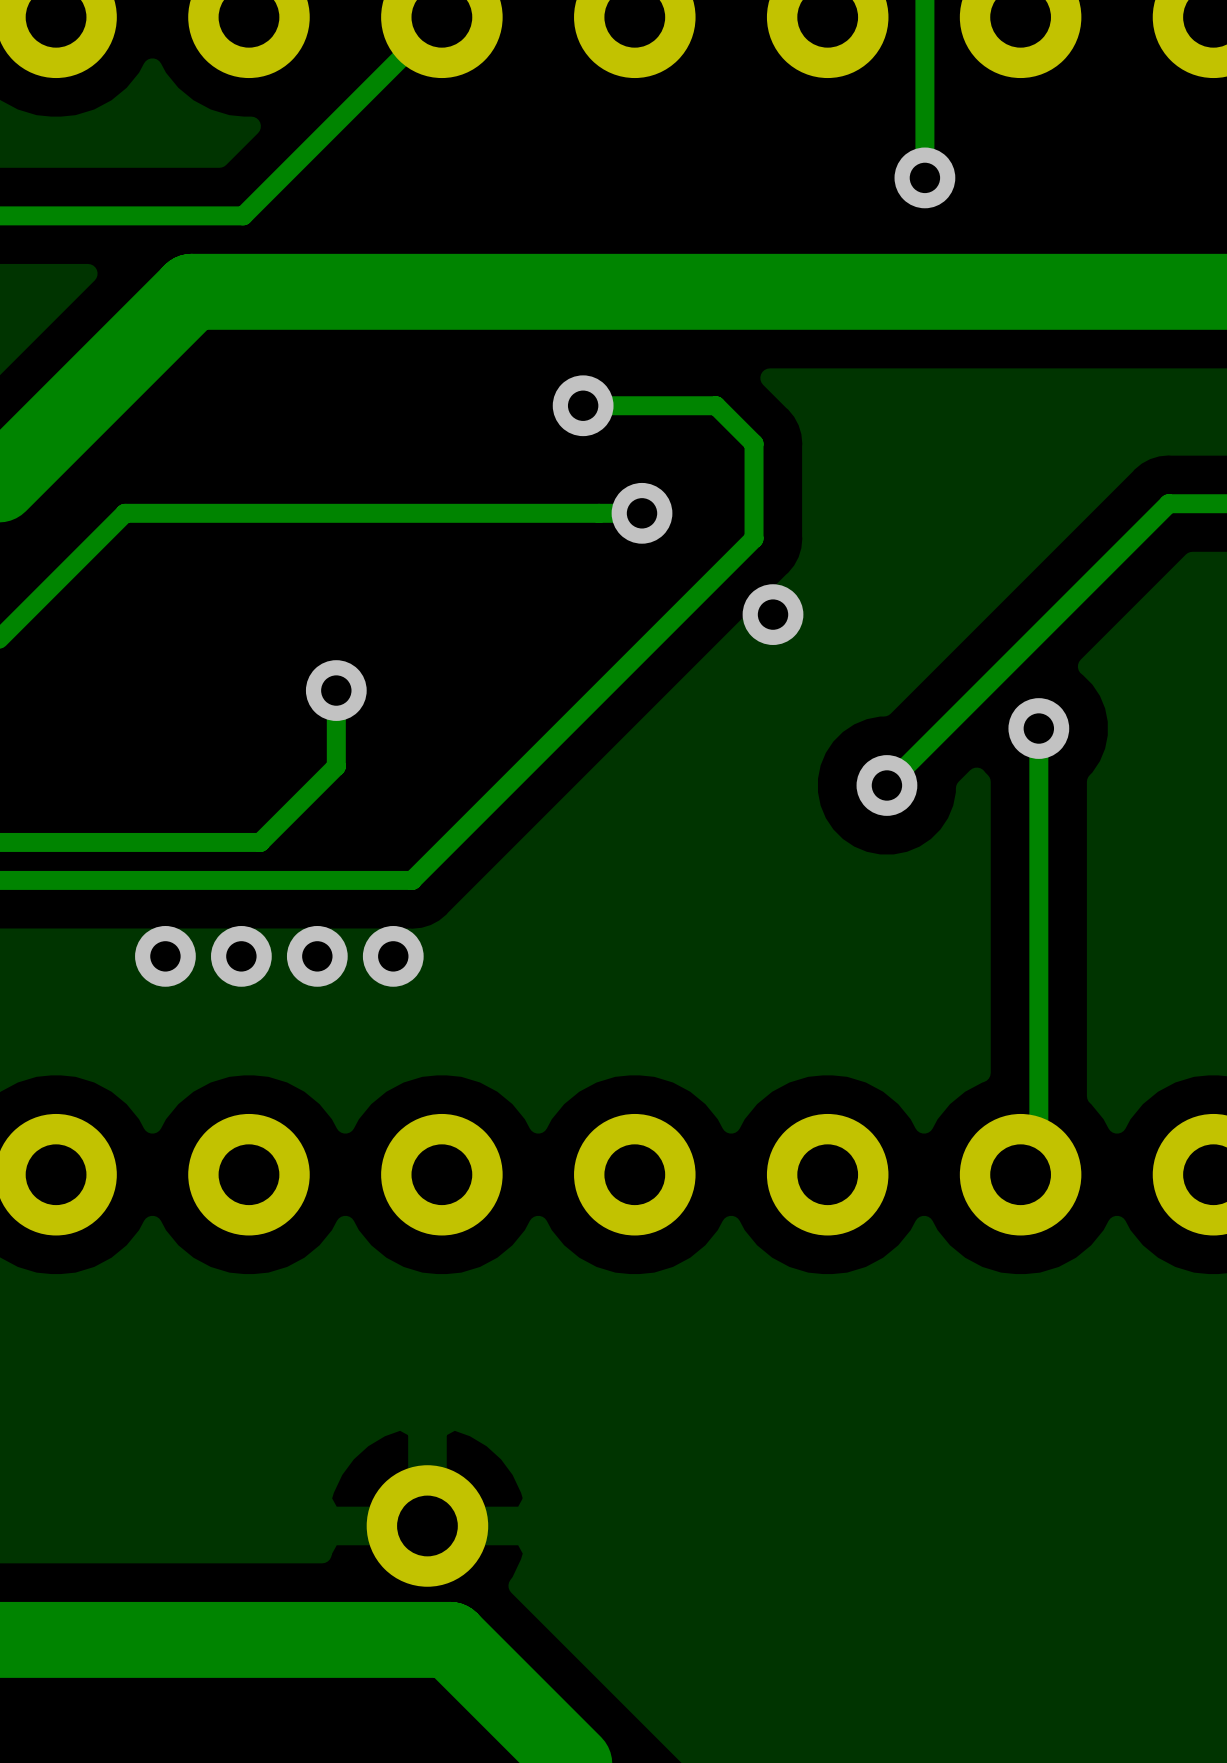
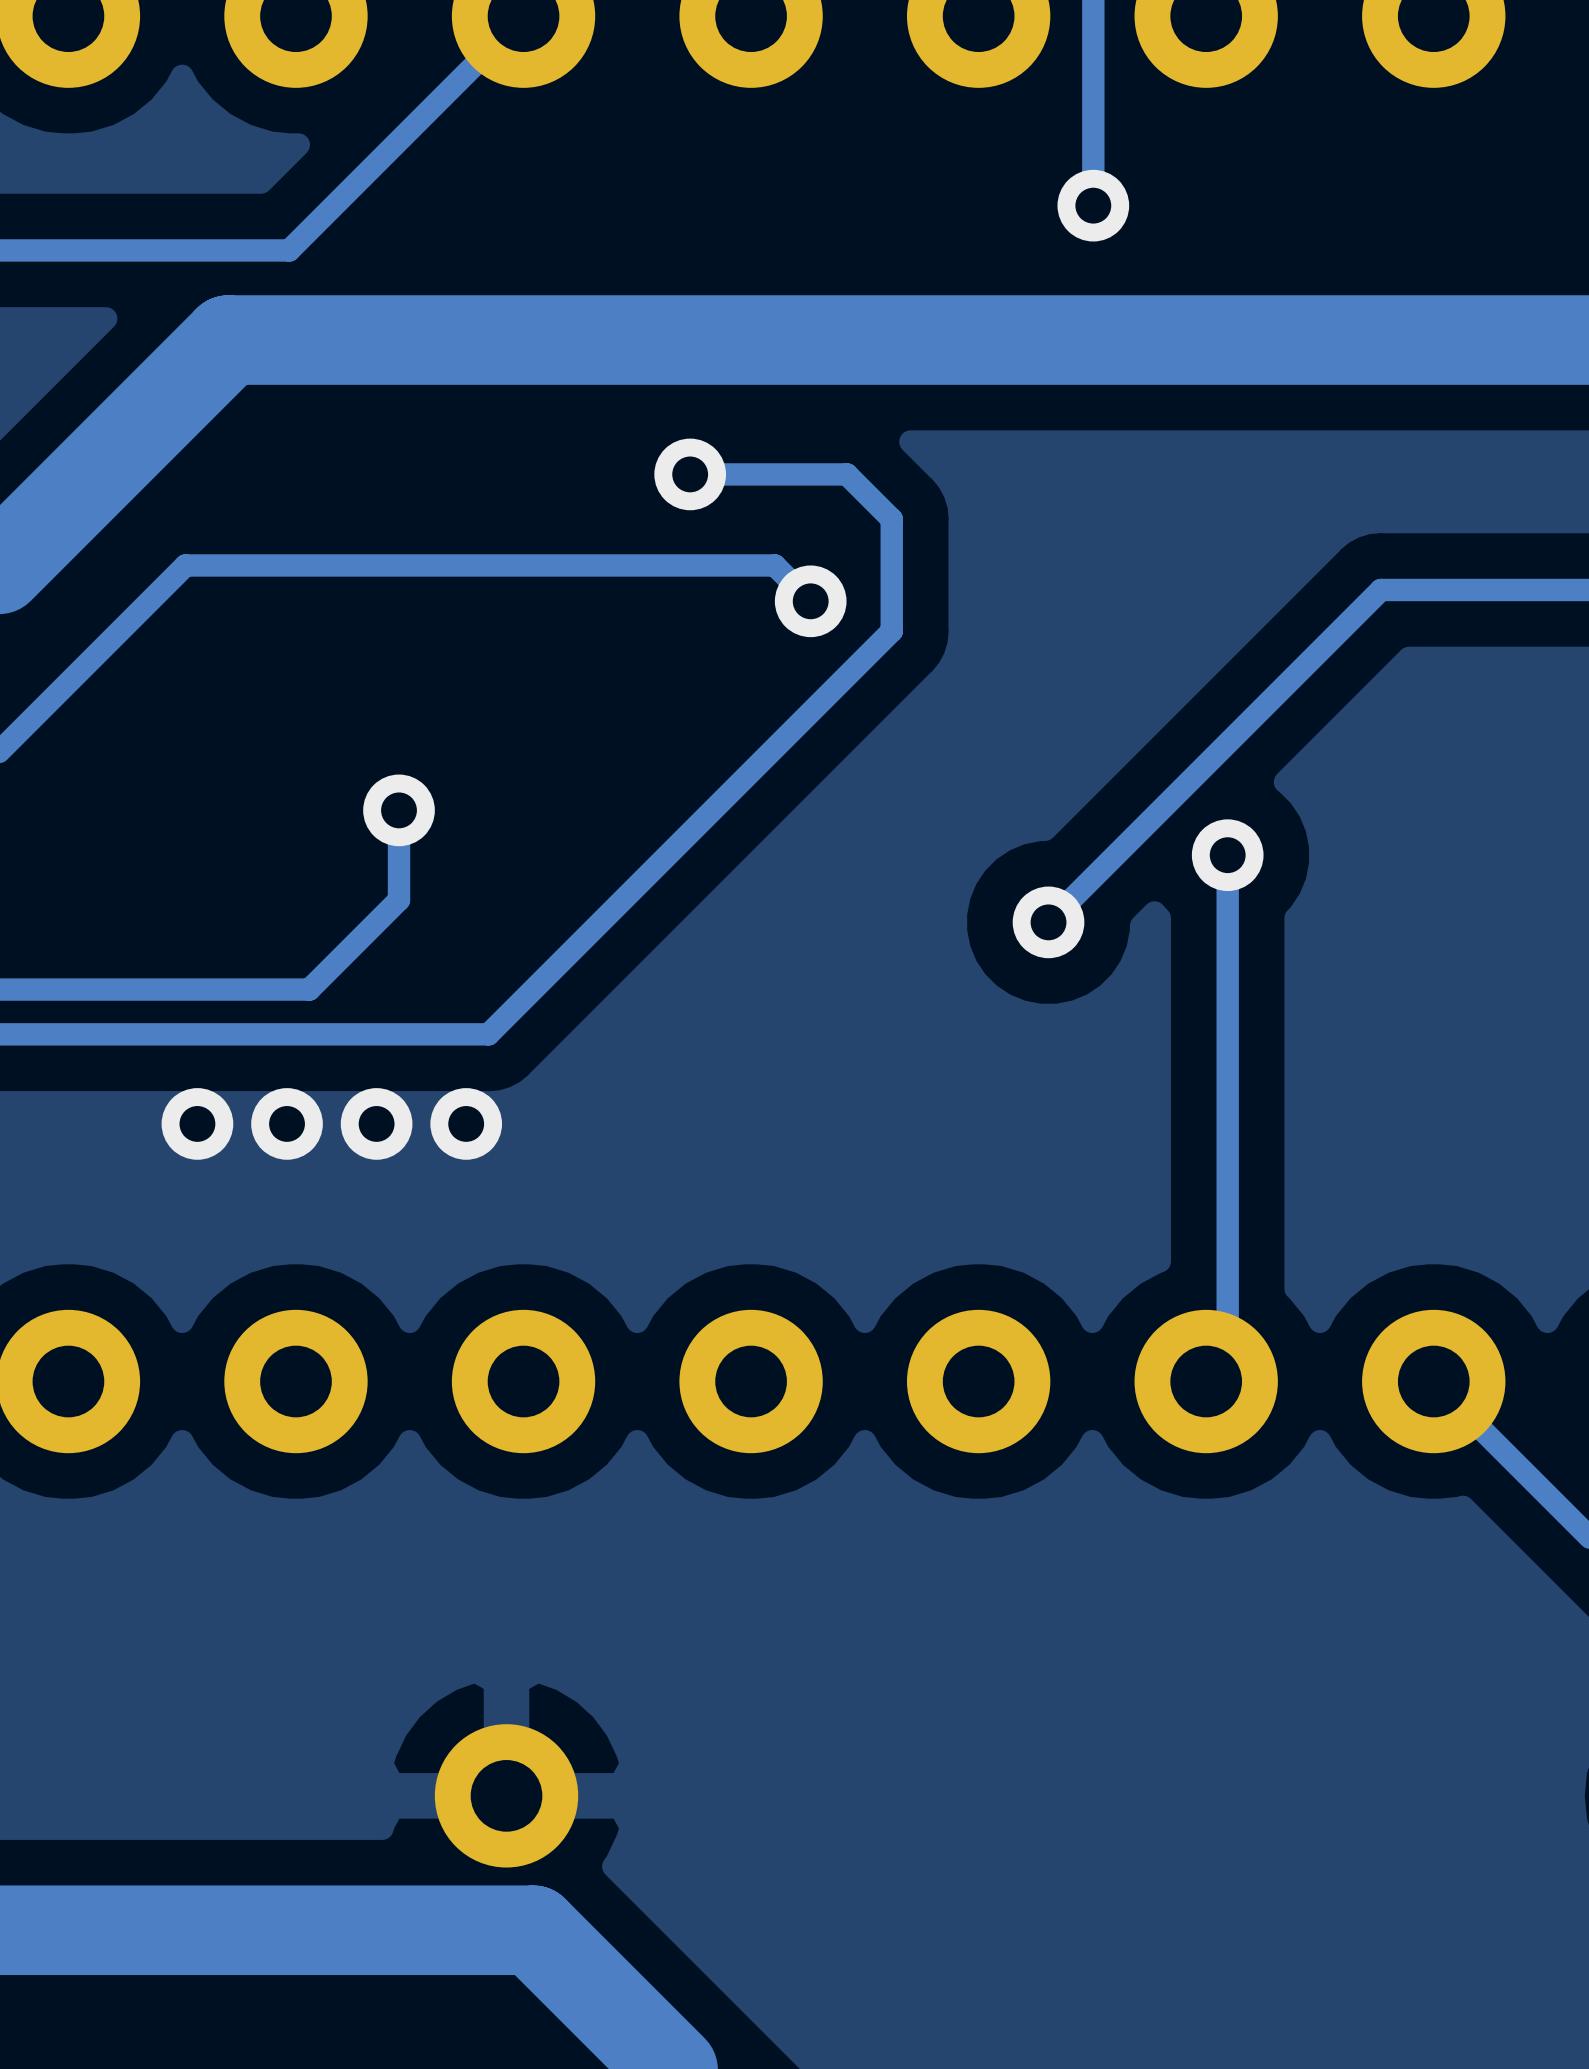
track: (642, 513) (124, 513) -> (810, 601) (774, 565) (185, 565) (149, 601)
via position: (642, 513) -> (810, 601)
via: (773, 614) -> none

